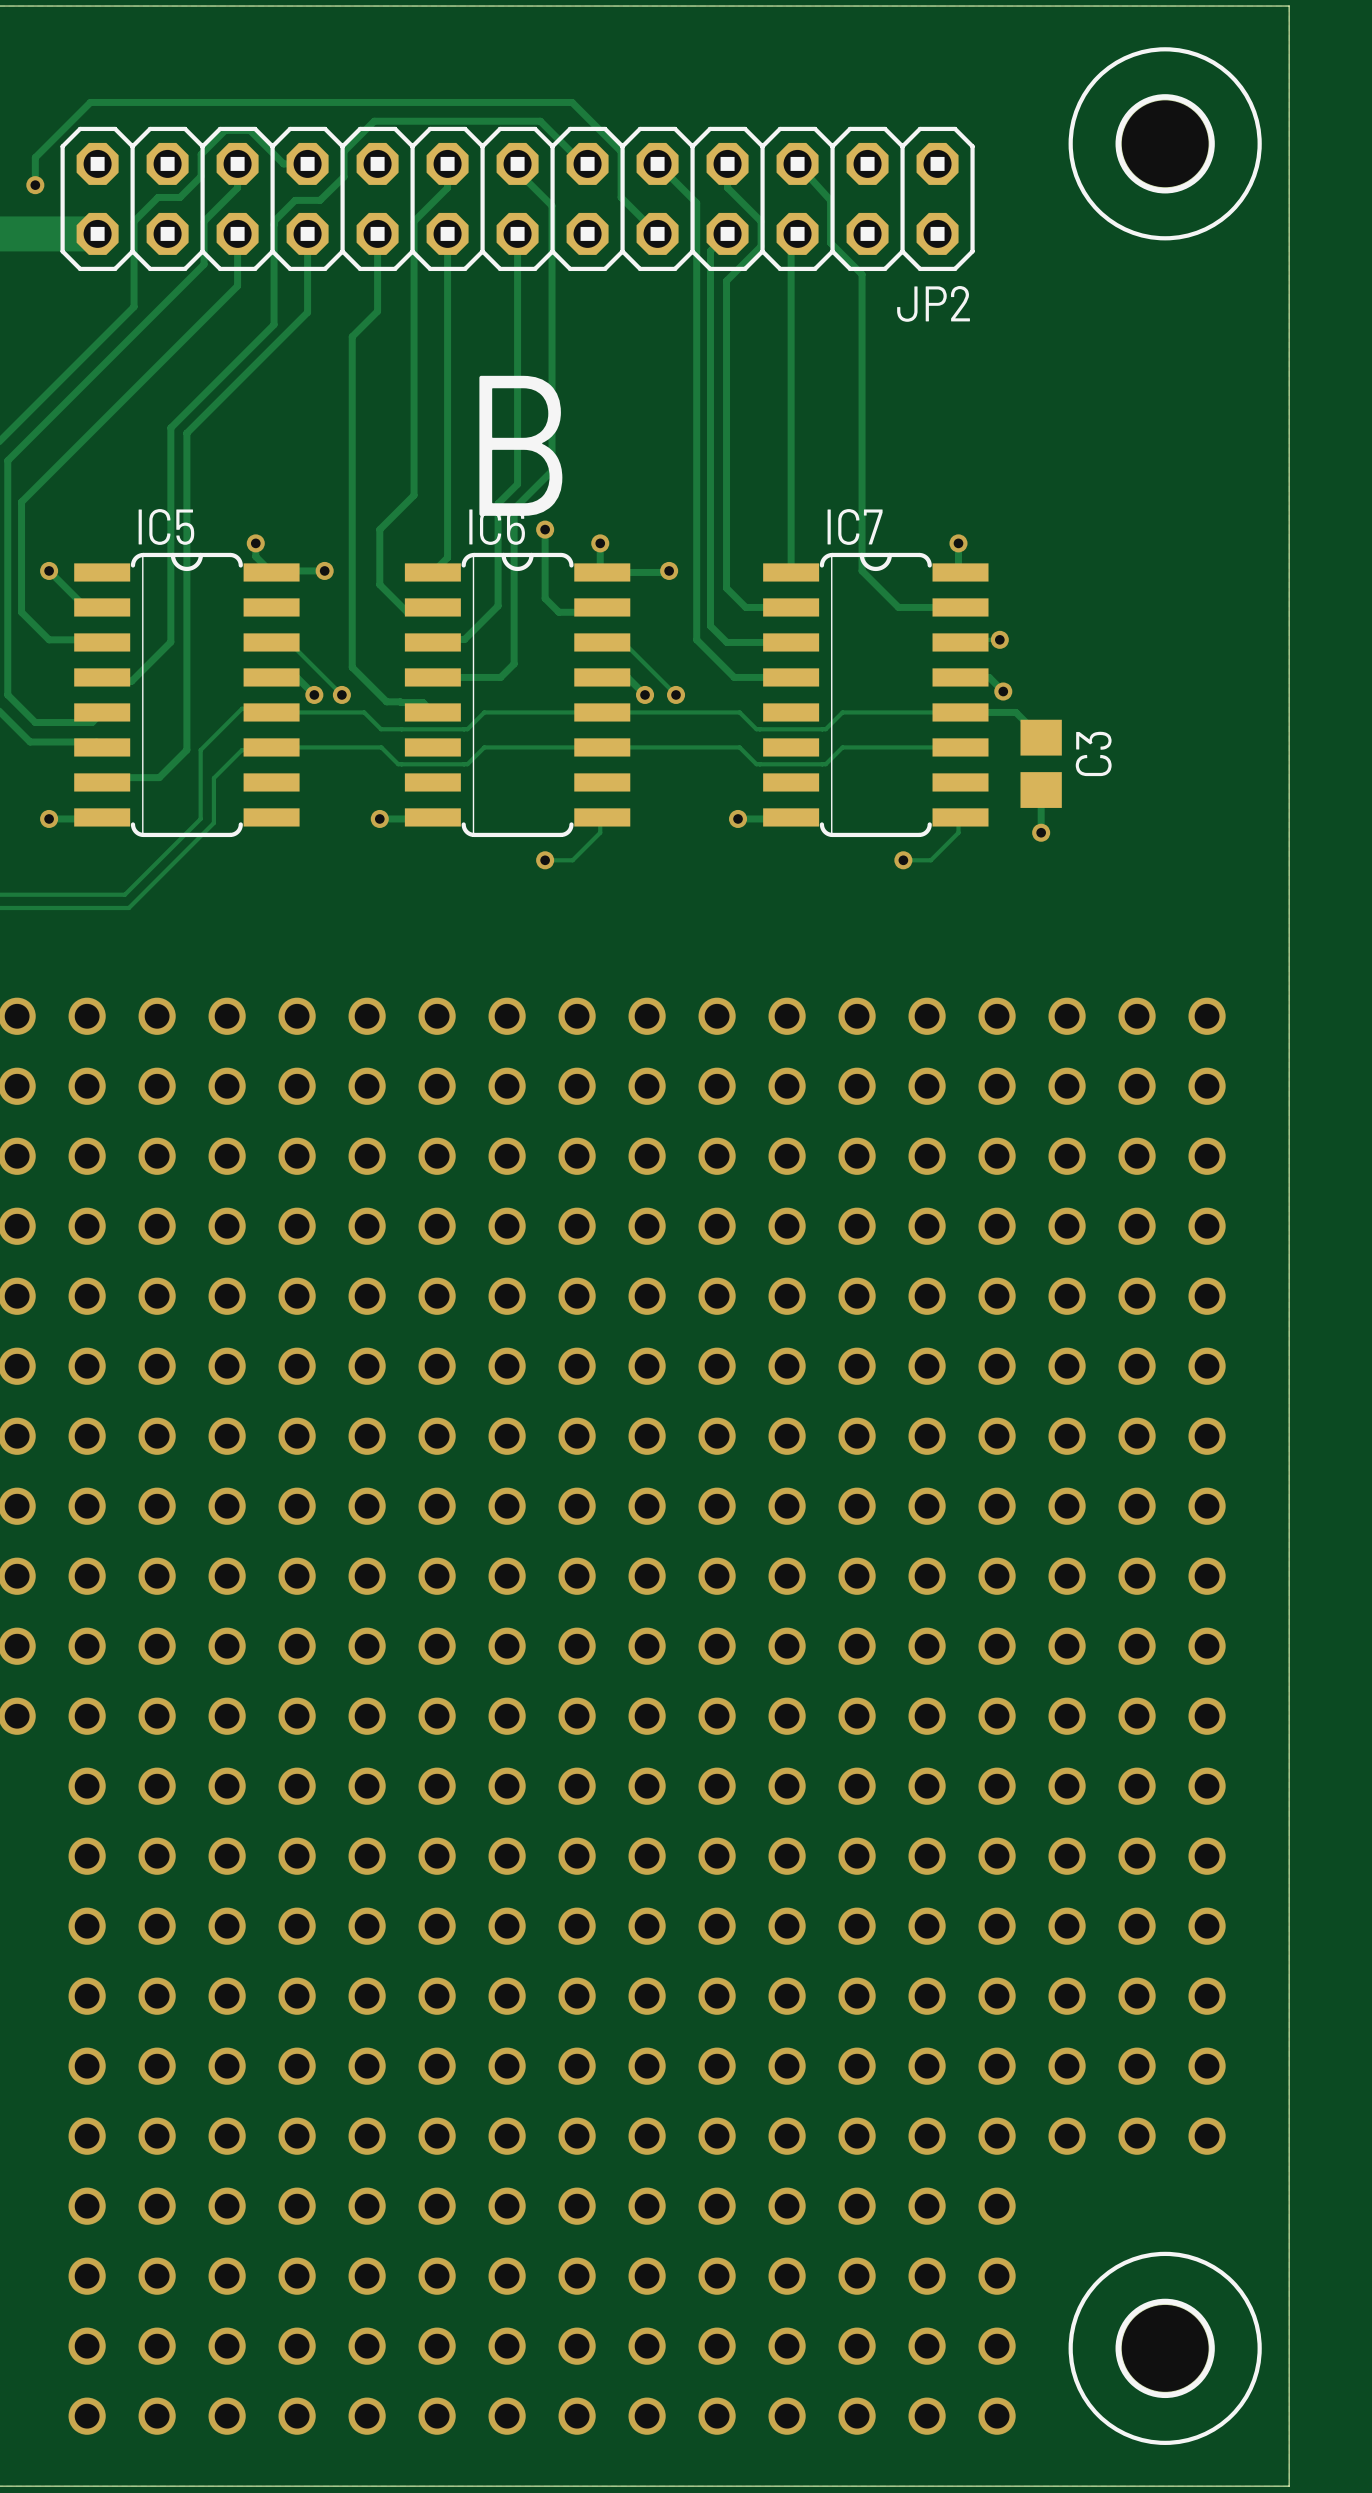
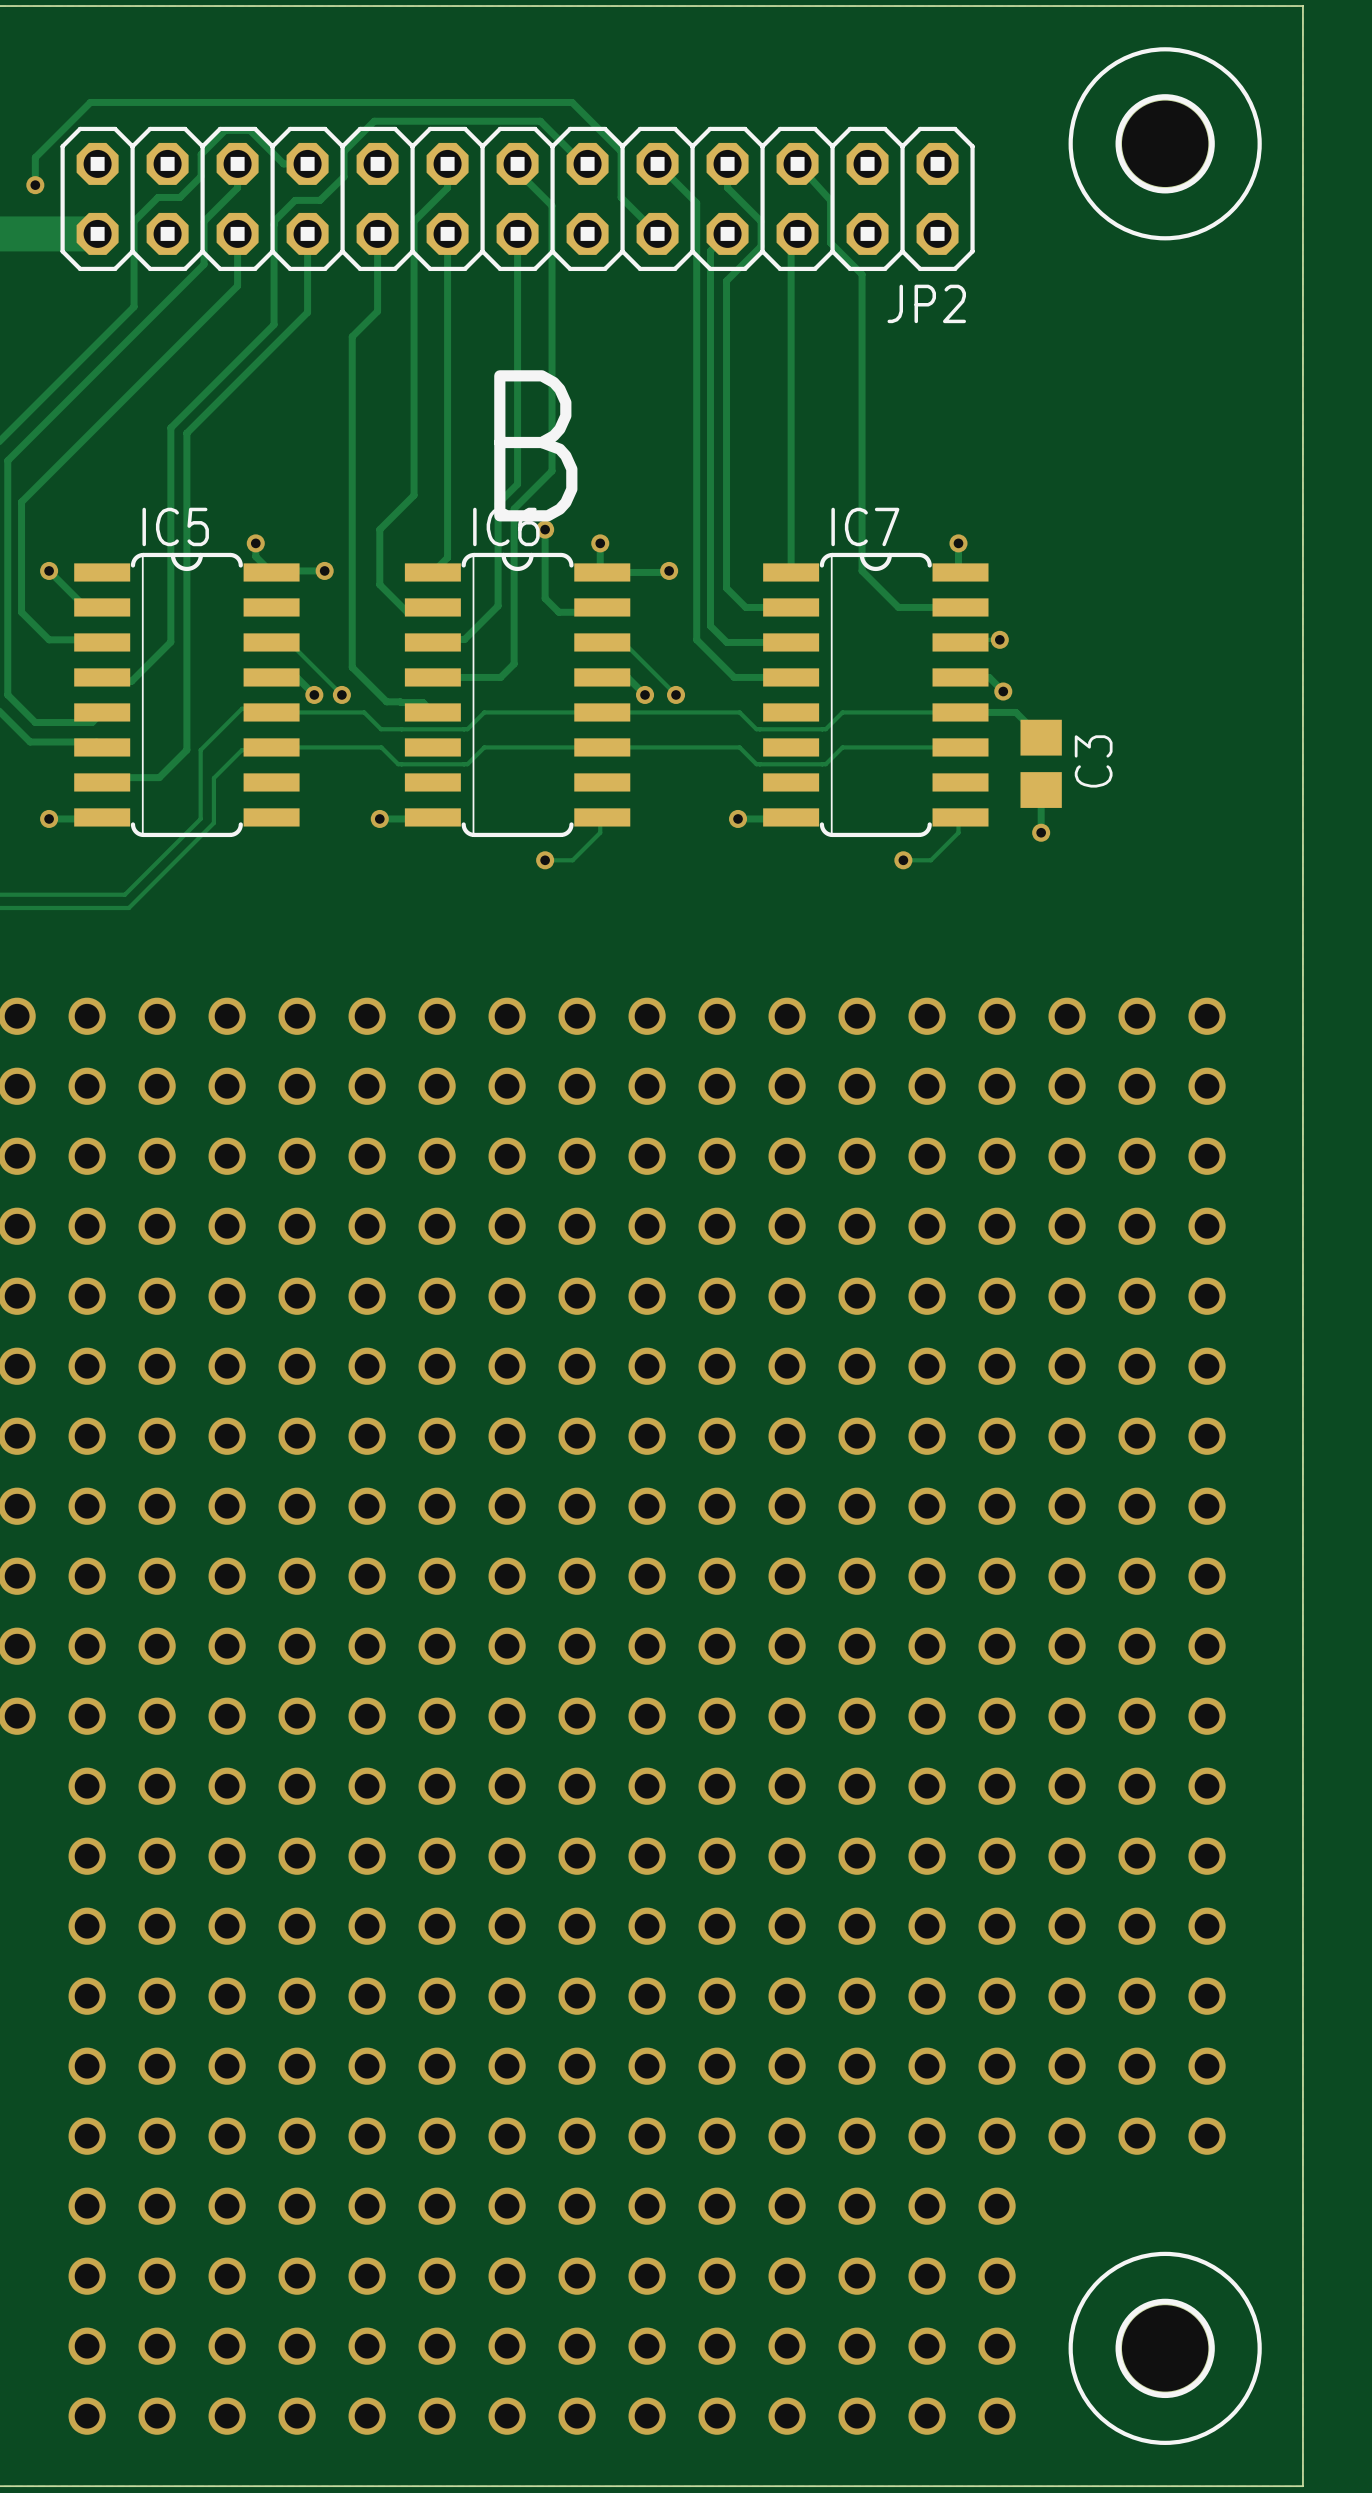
board edge: (1289, 6) (1289, 2486) -> (1289, 6) (1302, 6) (1302, 2486) (1289, 2486)

